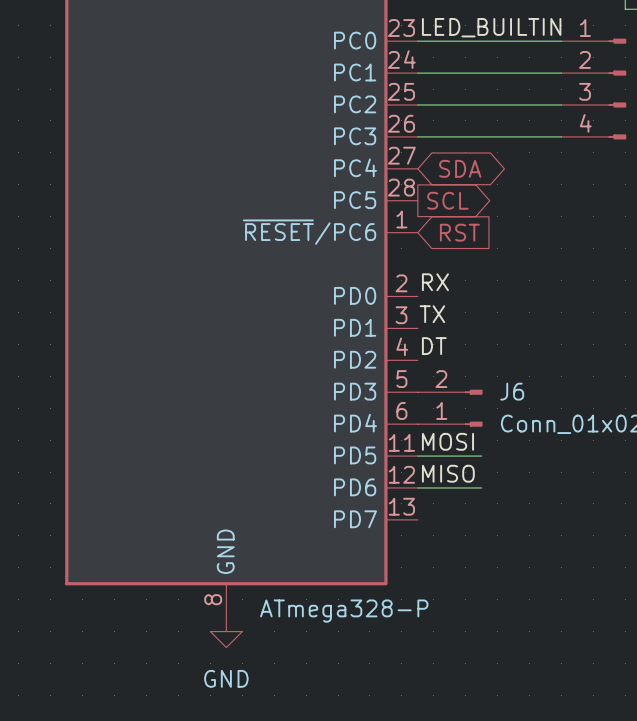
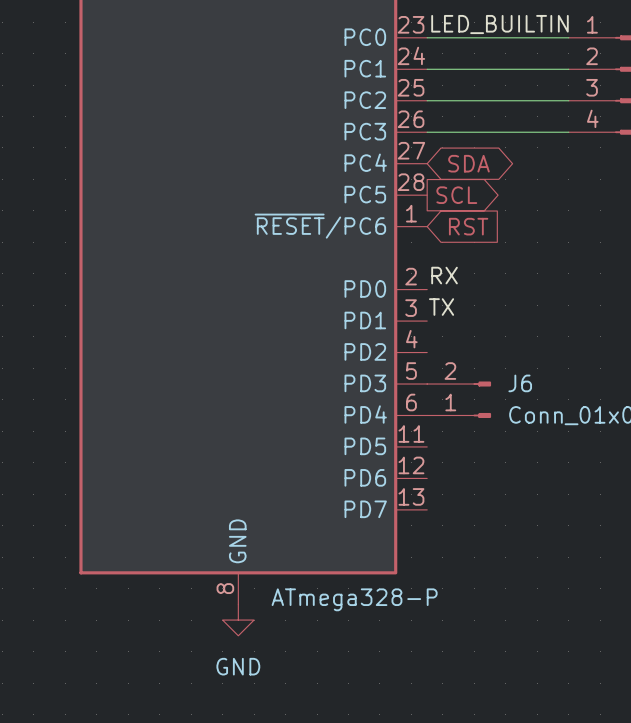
label: DT (434, 346) -> none
label: MOSI (447, 441) -> none
wire: (417, 456) (481, 456) -> none
label: MISO (448, 473) -> none
wire: (417, 487) (481, 487) -> none

